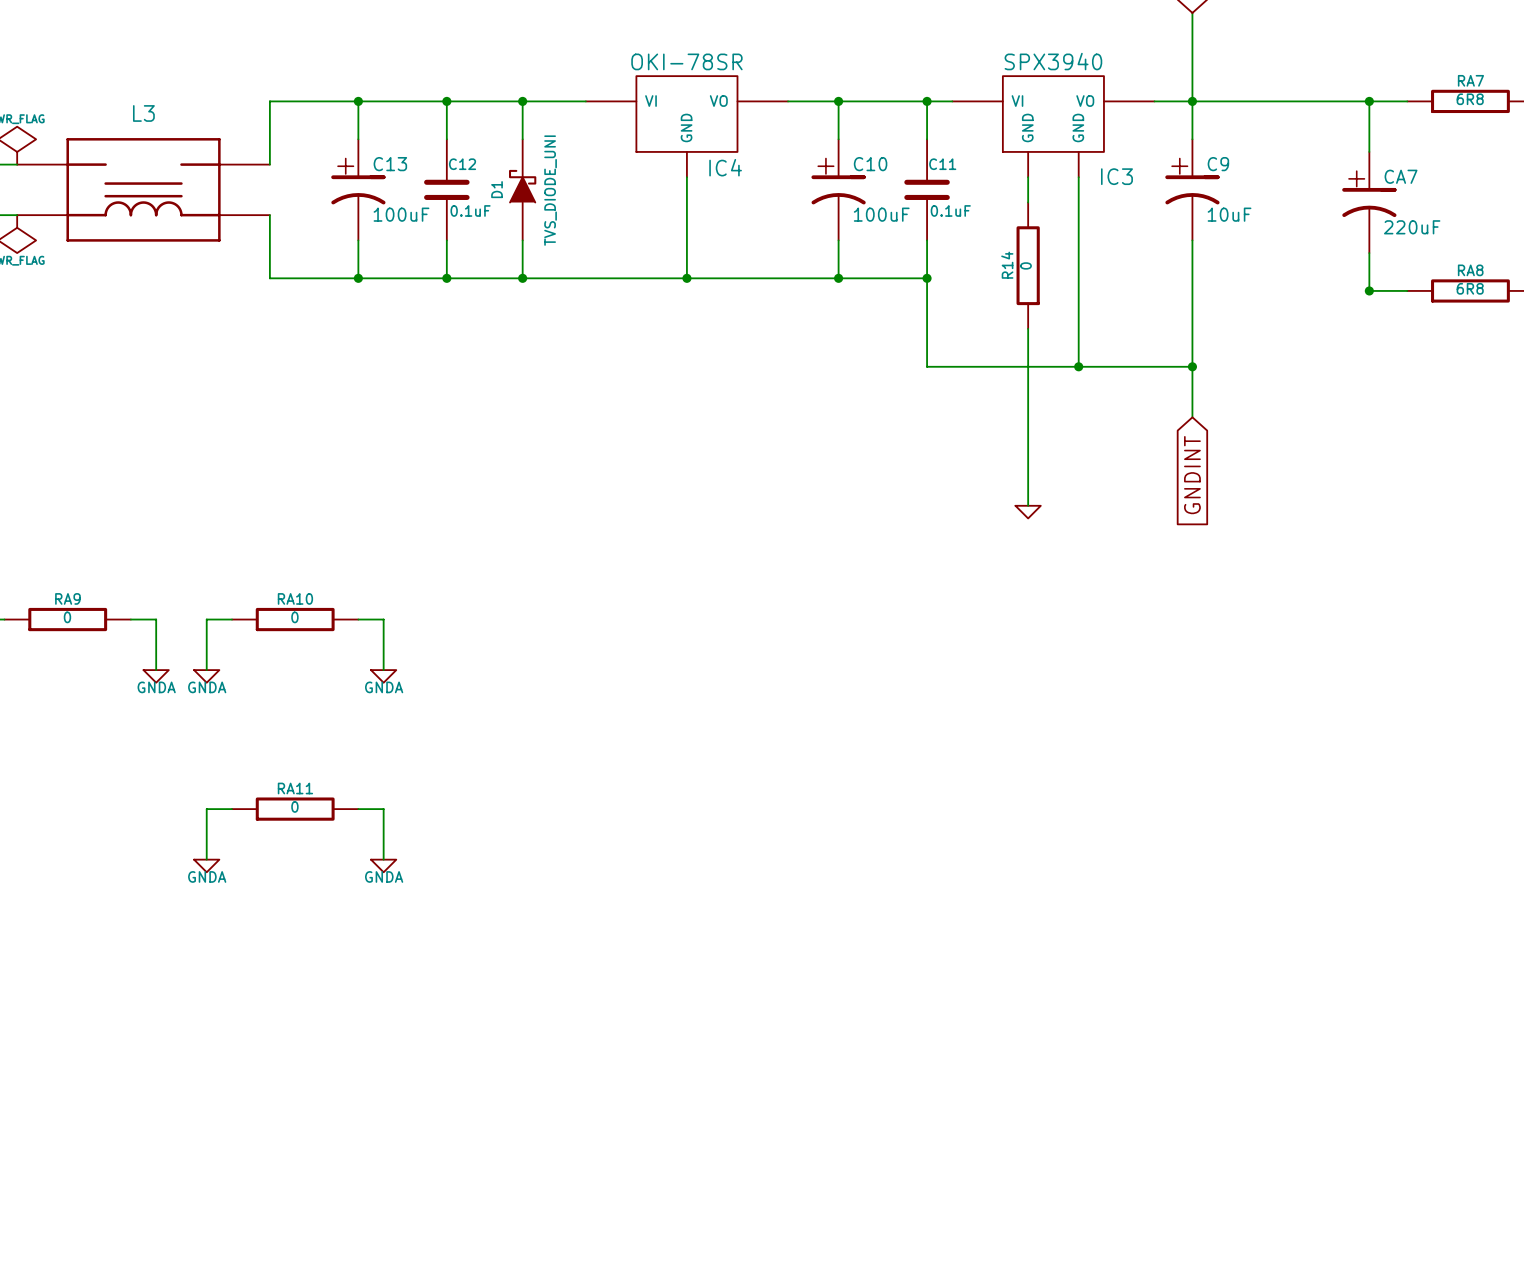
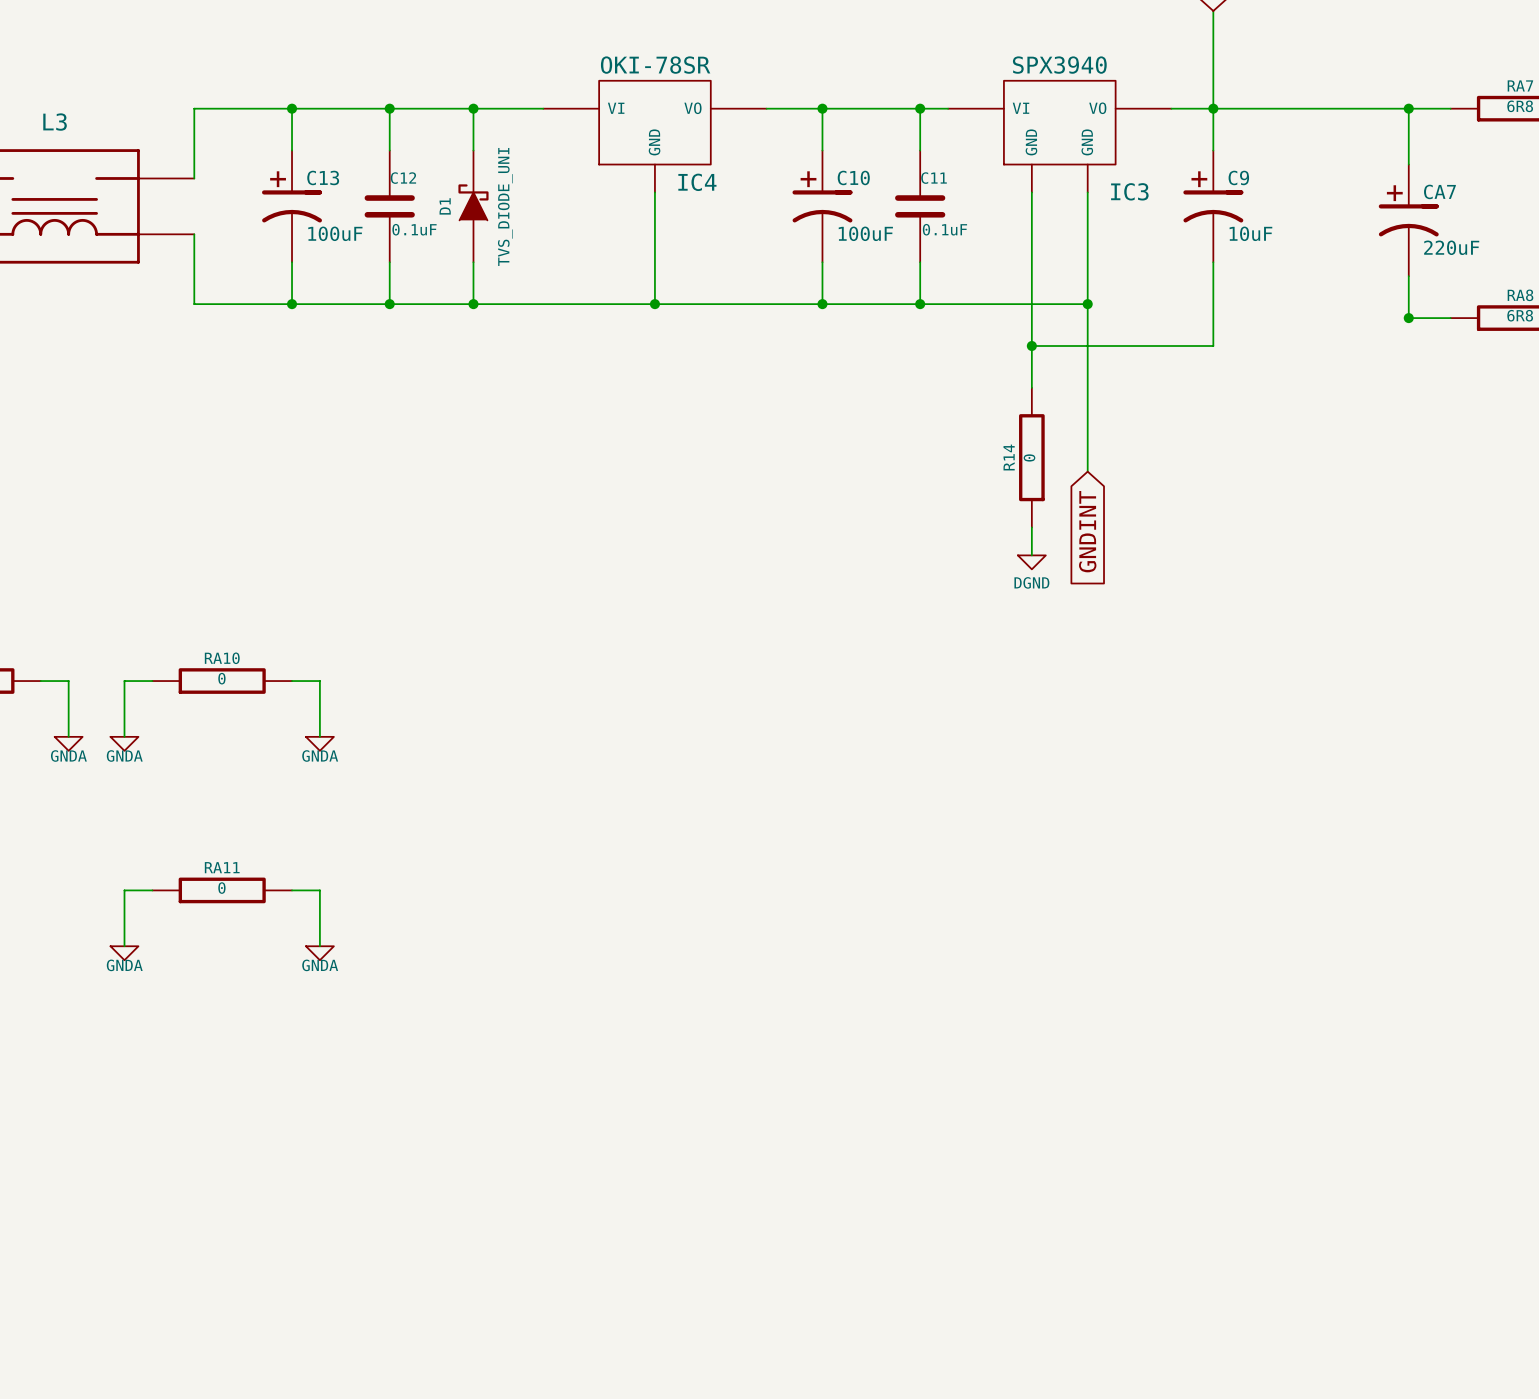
R14 position: (1028, 265) -> (1031, 457)
wire: (927, 278) (927, 366) (1192, 366) -> (920, 304) (1087, 304)
junction: none -> (1087, 304)
junction: none -> (1031, 346)
wire: (1192, 316) (1192, 417) -> (1213, 346) (1031, 346)
wire: (1028, 354) (1028, 480) -> (1031, 220) (1031, 359)
wire: none -> (1087, 401) (1087, 471)
junction: (1078, 366) -> none
junction: (1192, 366) -> none
global label position: GNDINT (1192, 475) -> GNDINT (1087, 531)
power symbol text: none -> DGND (1031, 582)

